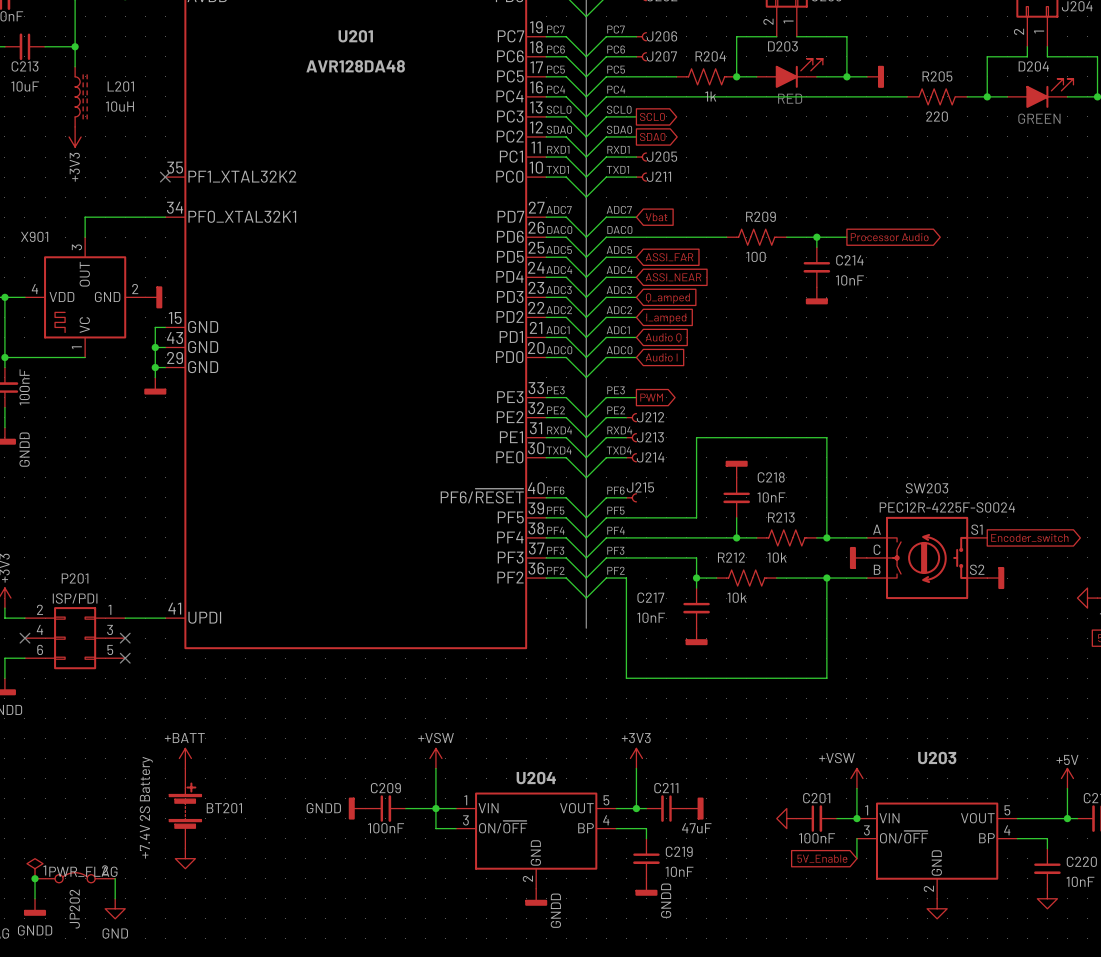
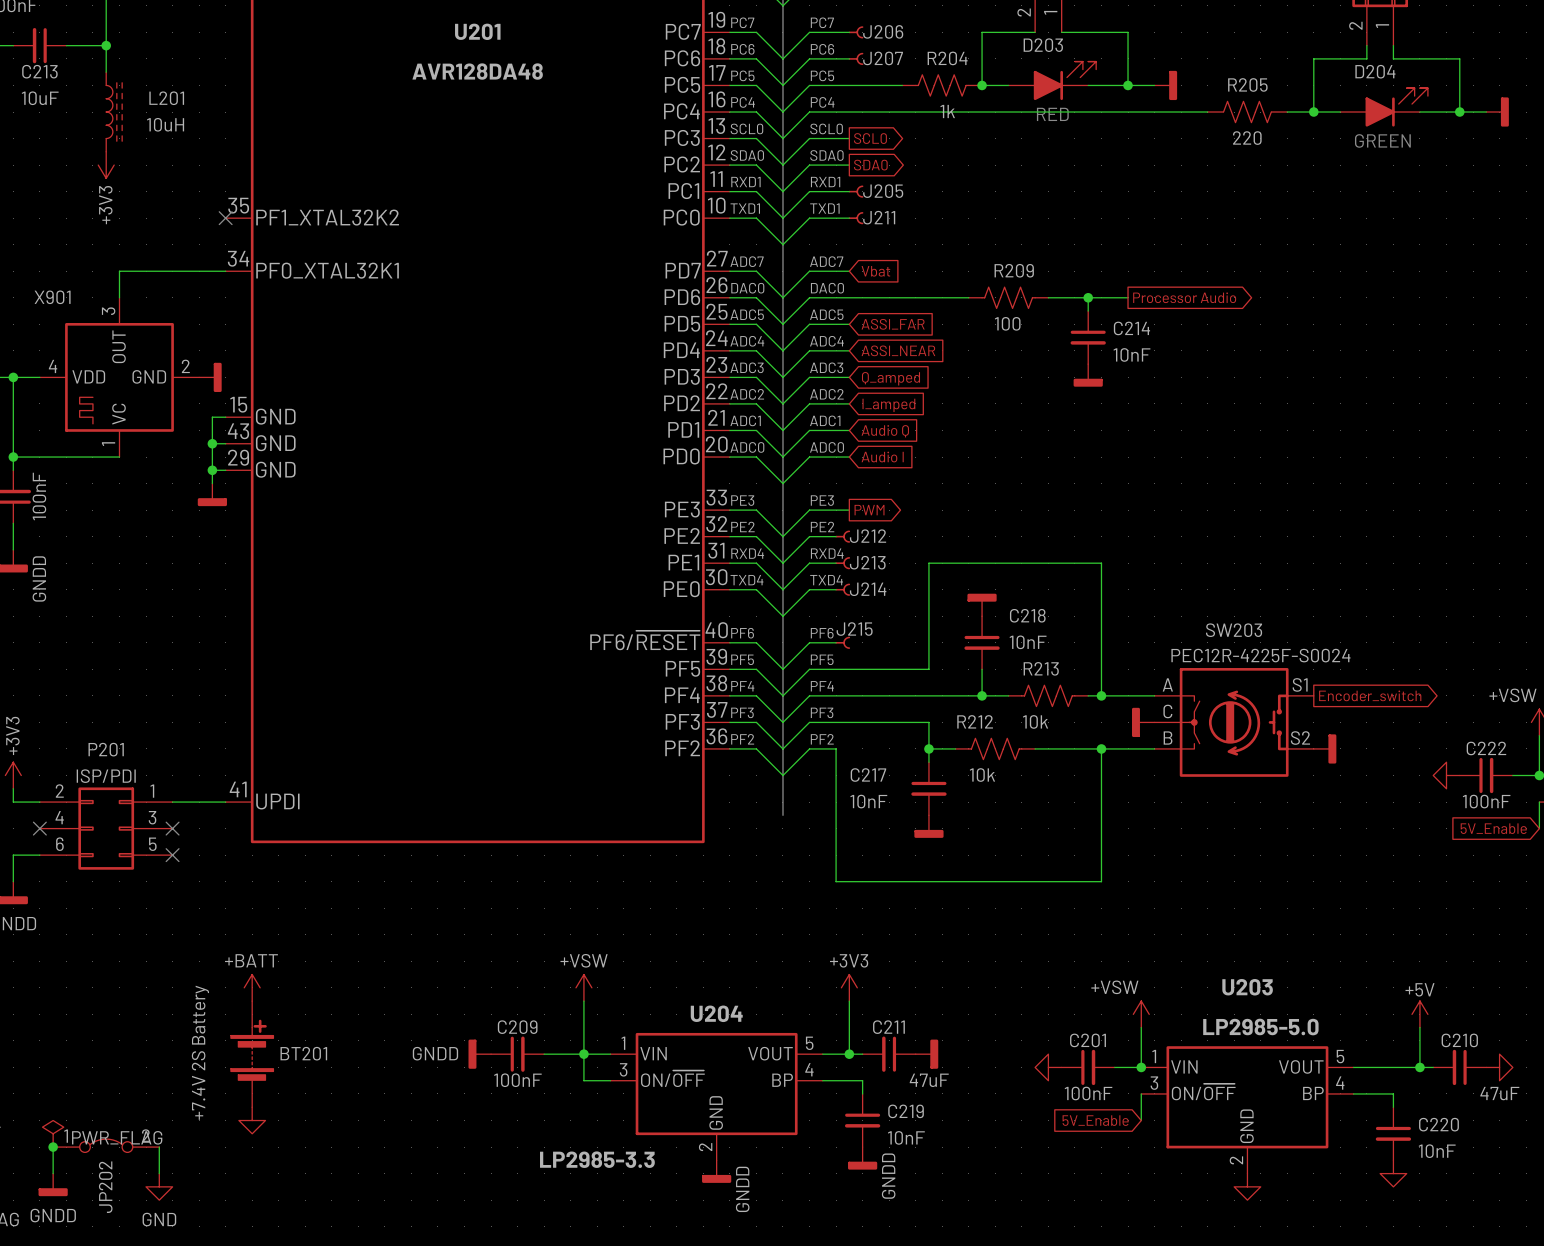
U203 value: none -> LP2985-5.0 (1260, 1027)
U204 value: none -> LP2985-3.3 (597, 1159)

